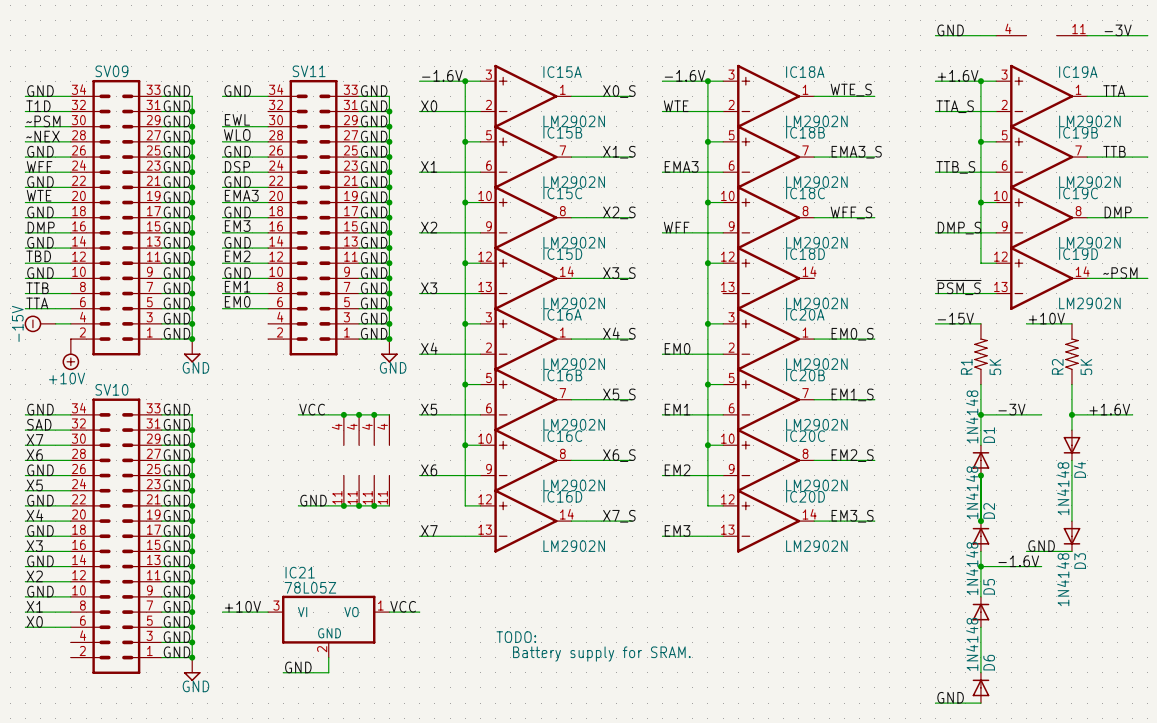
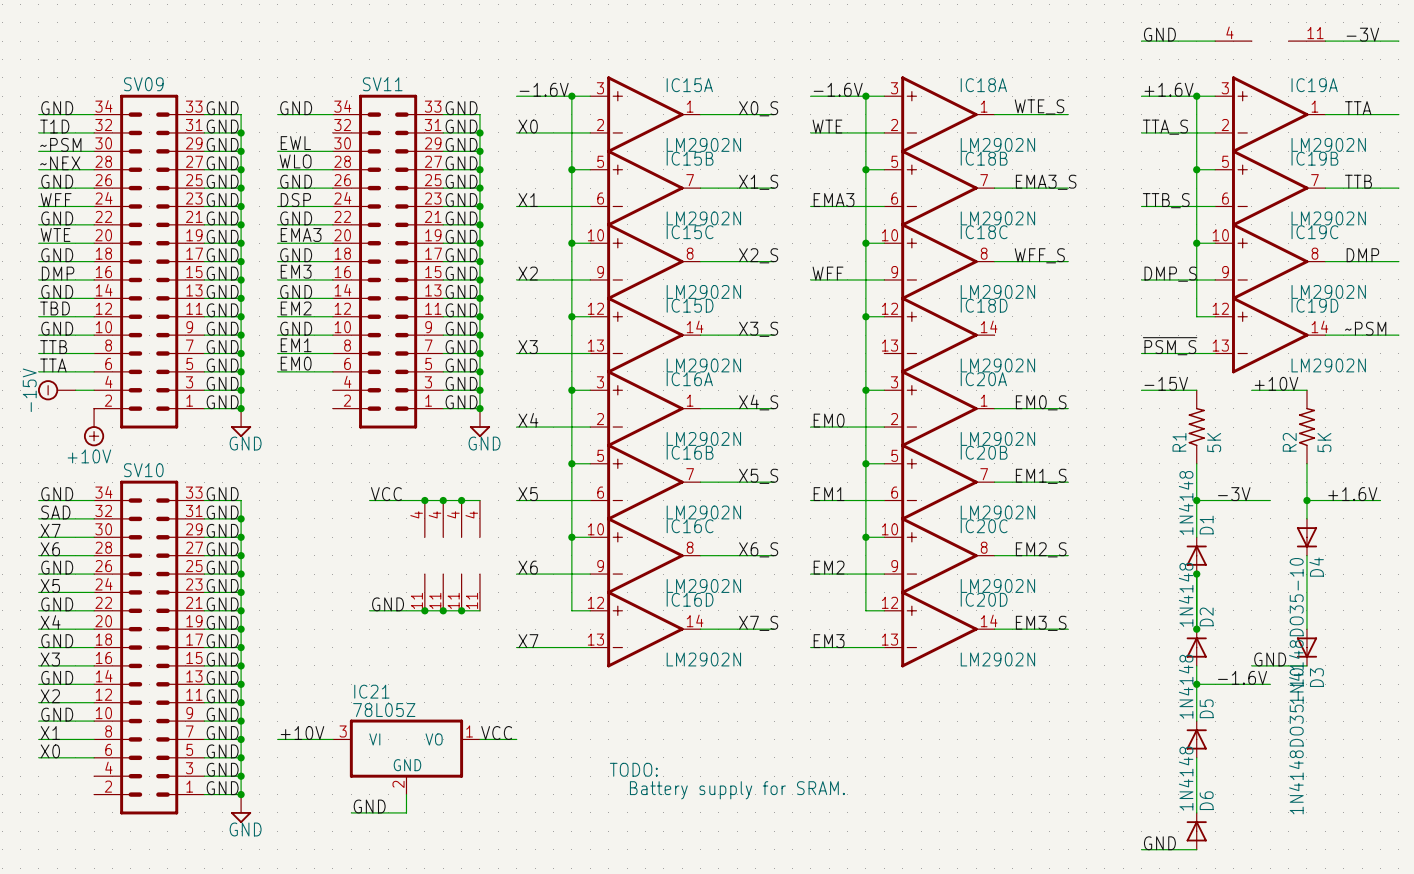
D4 value: 1N4148 (1063, 488) -> 1N4148DO35-10 (1296, 631)
D3 value: 1N4148 (1063, 579) -> 1N4148DO35-10 (1296, 741)

